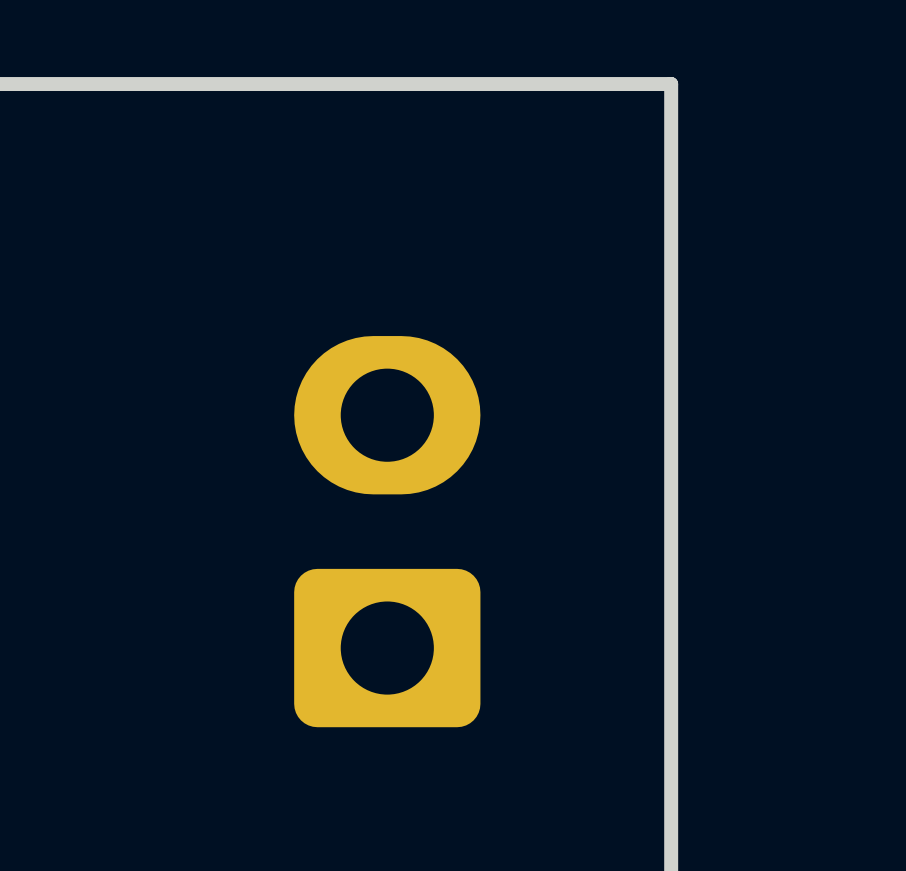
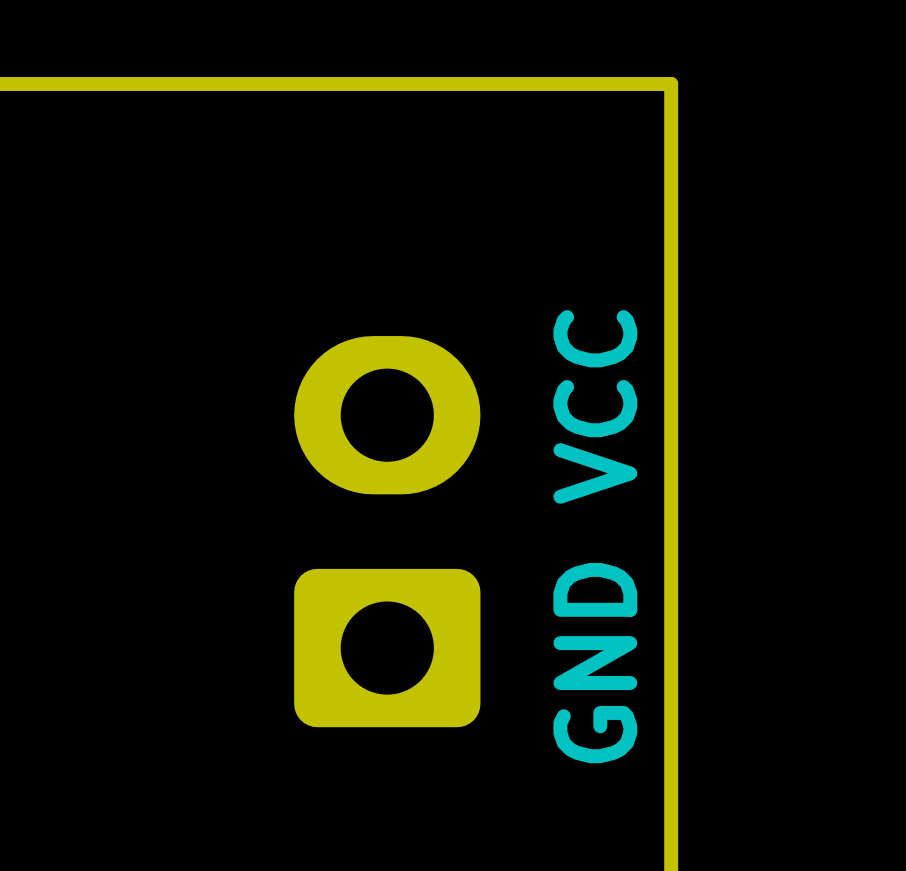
text: none -> GND VCC (595, 536)

